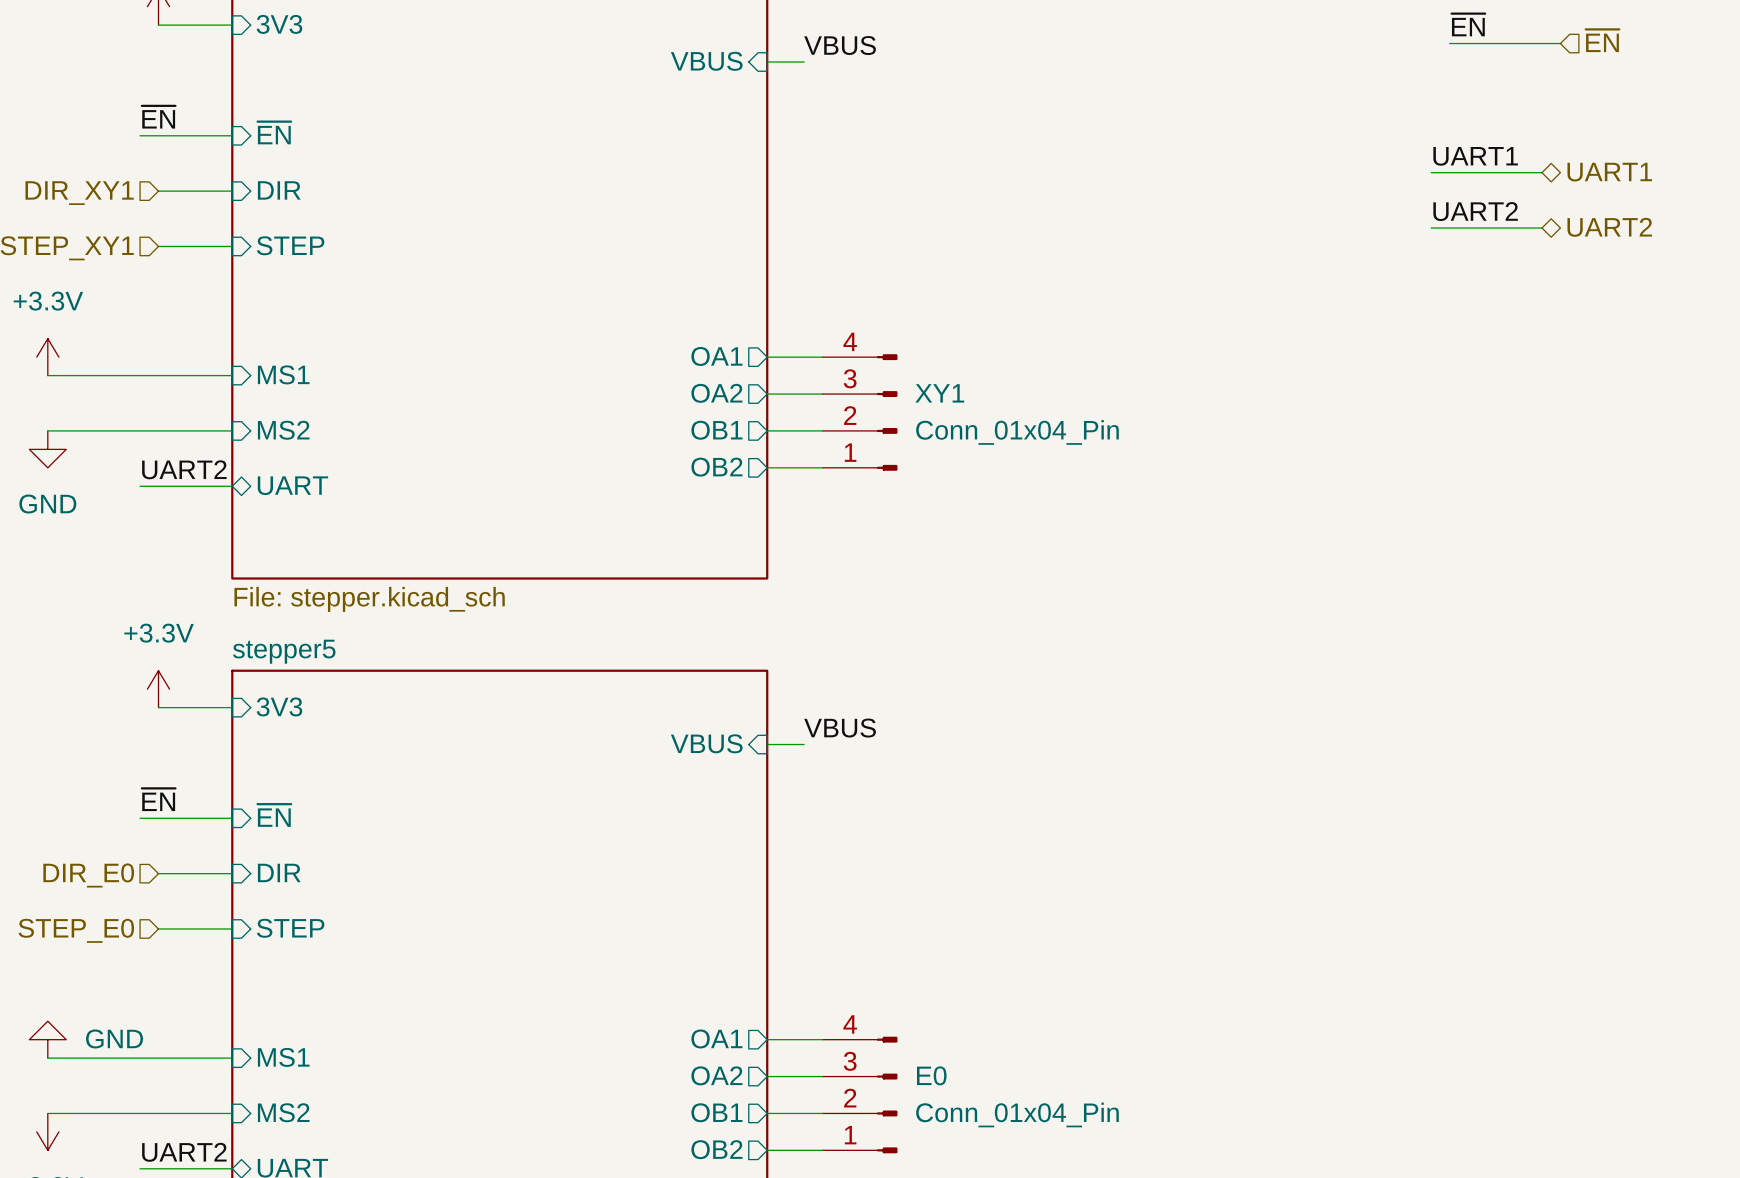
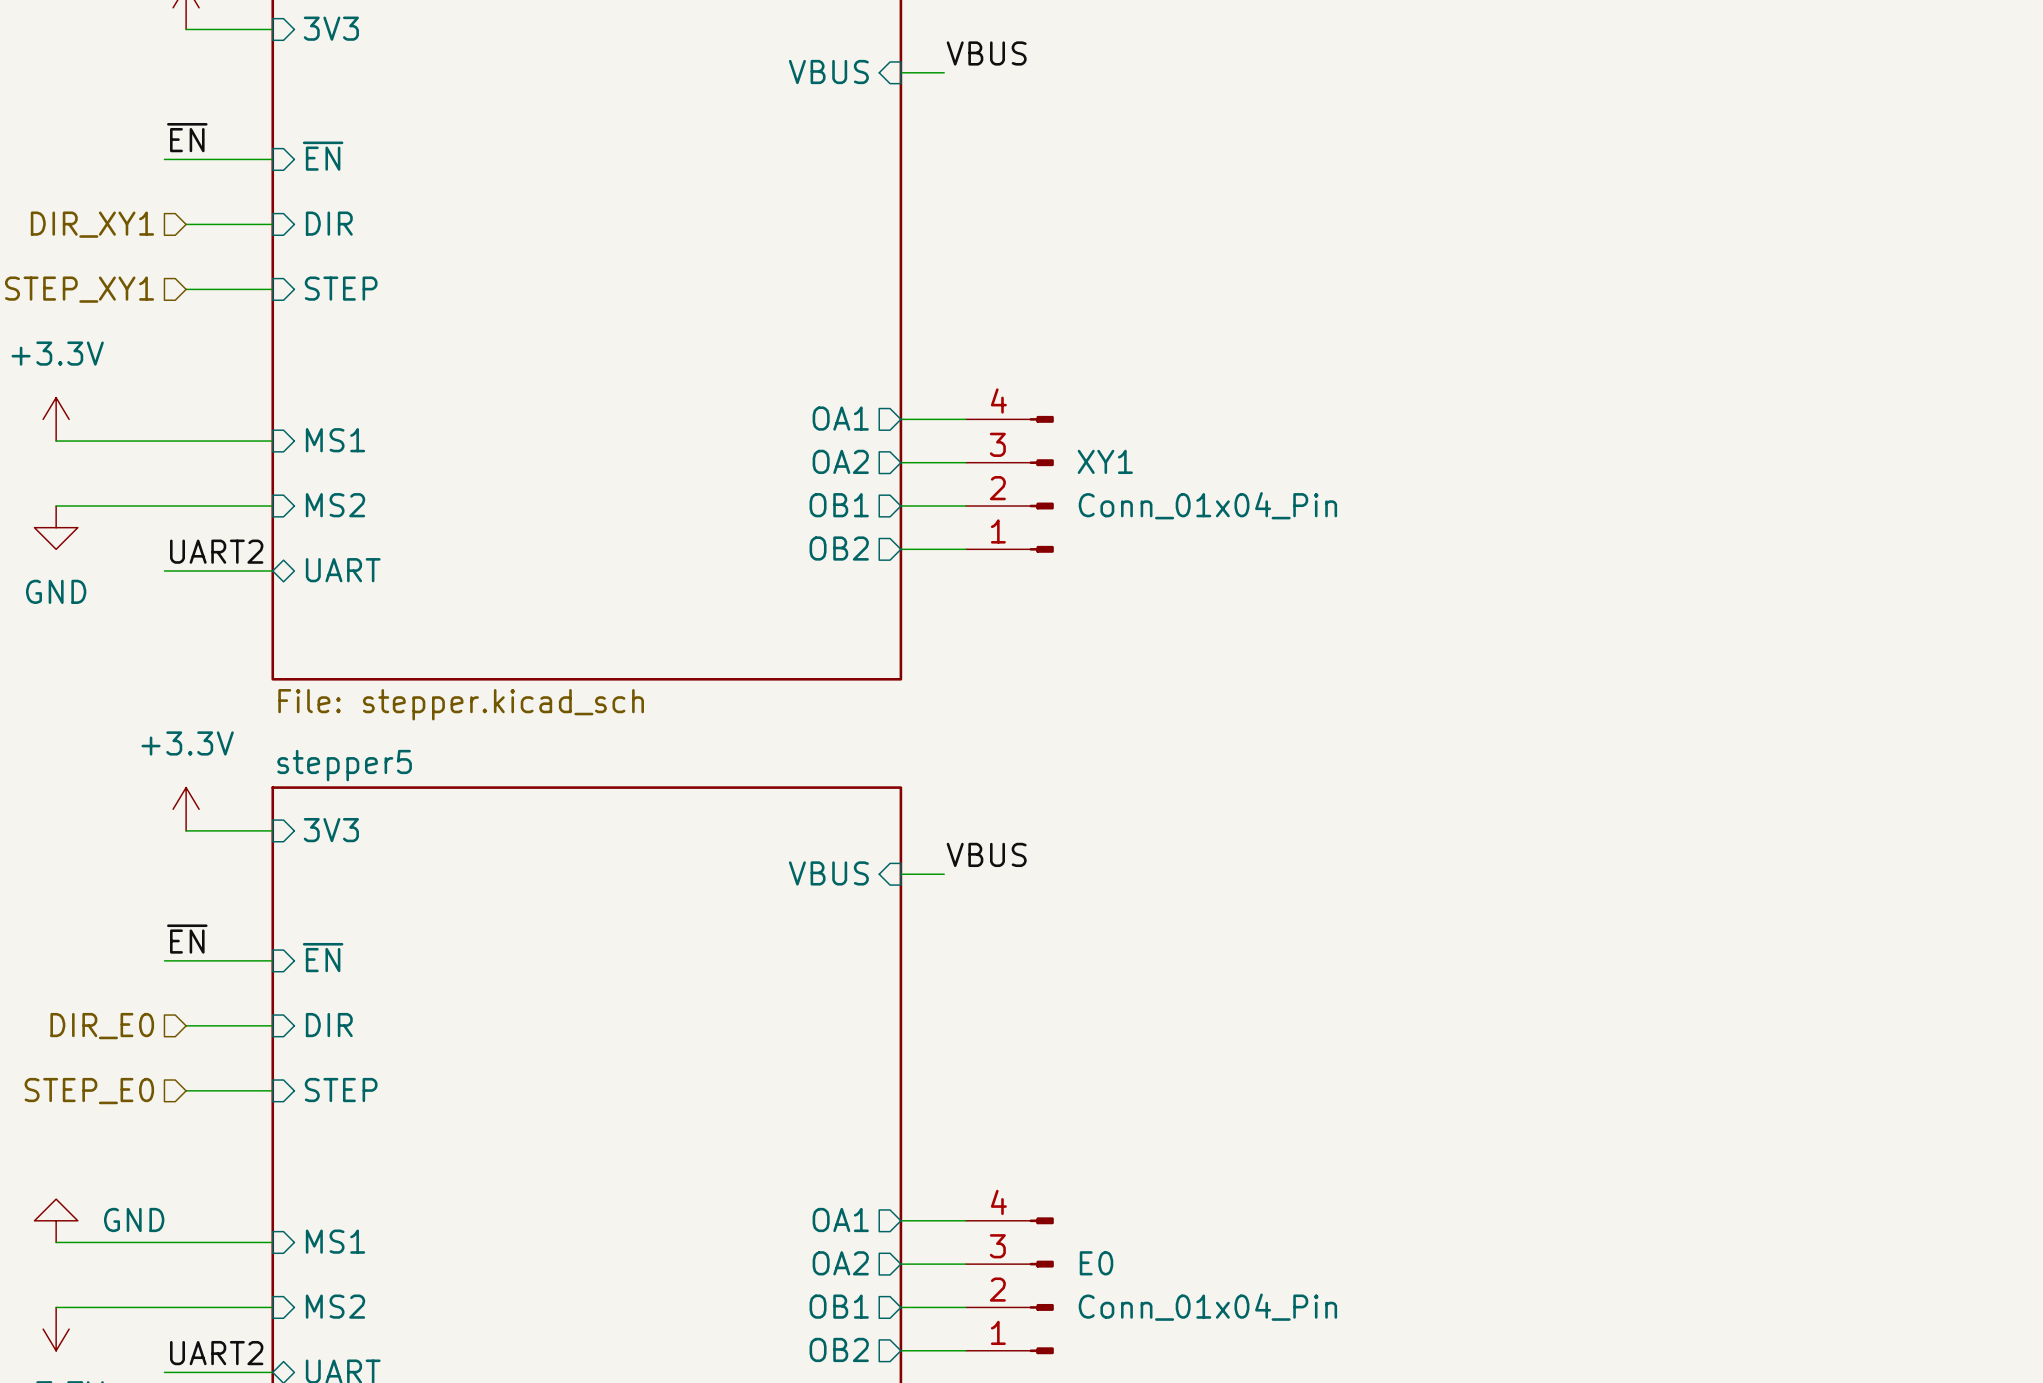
label: ~{EN} (1468, 24) -> none
hierarchical label: ~{EN} (1602, 40) -> none
wire: (1449, 43) (1560, 43) -> none
label: UART1 (1475, 156) -> none
wire: (1431, 172) (1541, 172) -> none
hierarchical label: UART1 (1609, 172) -> none
label: UART2 (1475, 211) -> none
hierarchical label: UART2 (1609, 227) -> none
wire: (1431, 228) (1541, 228) -> none

